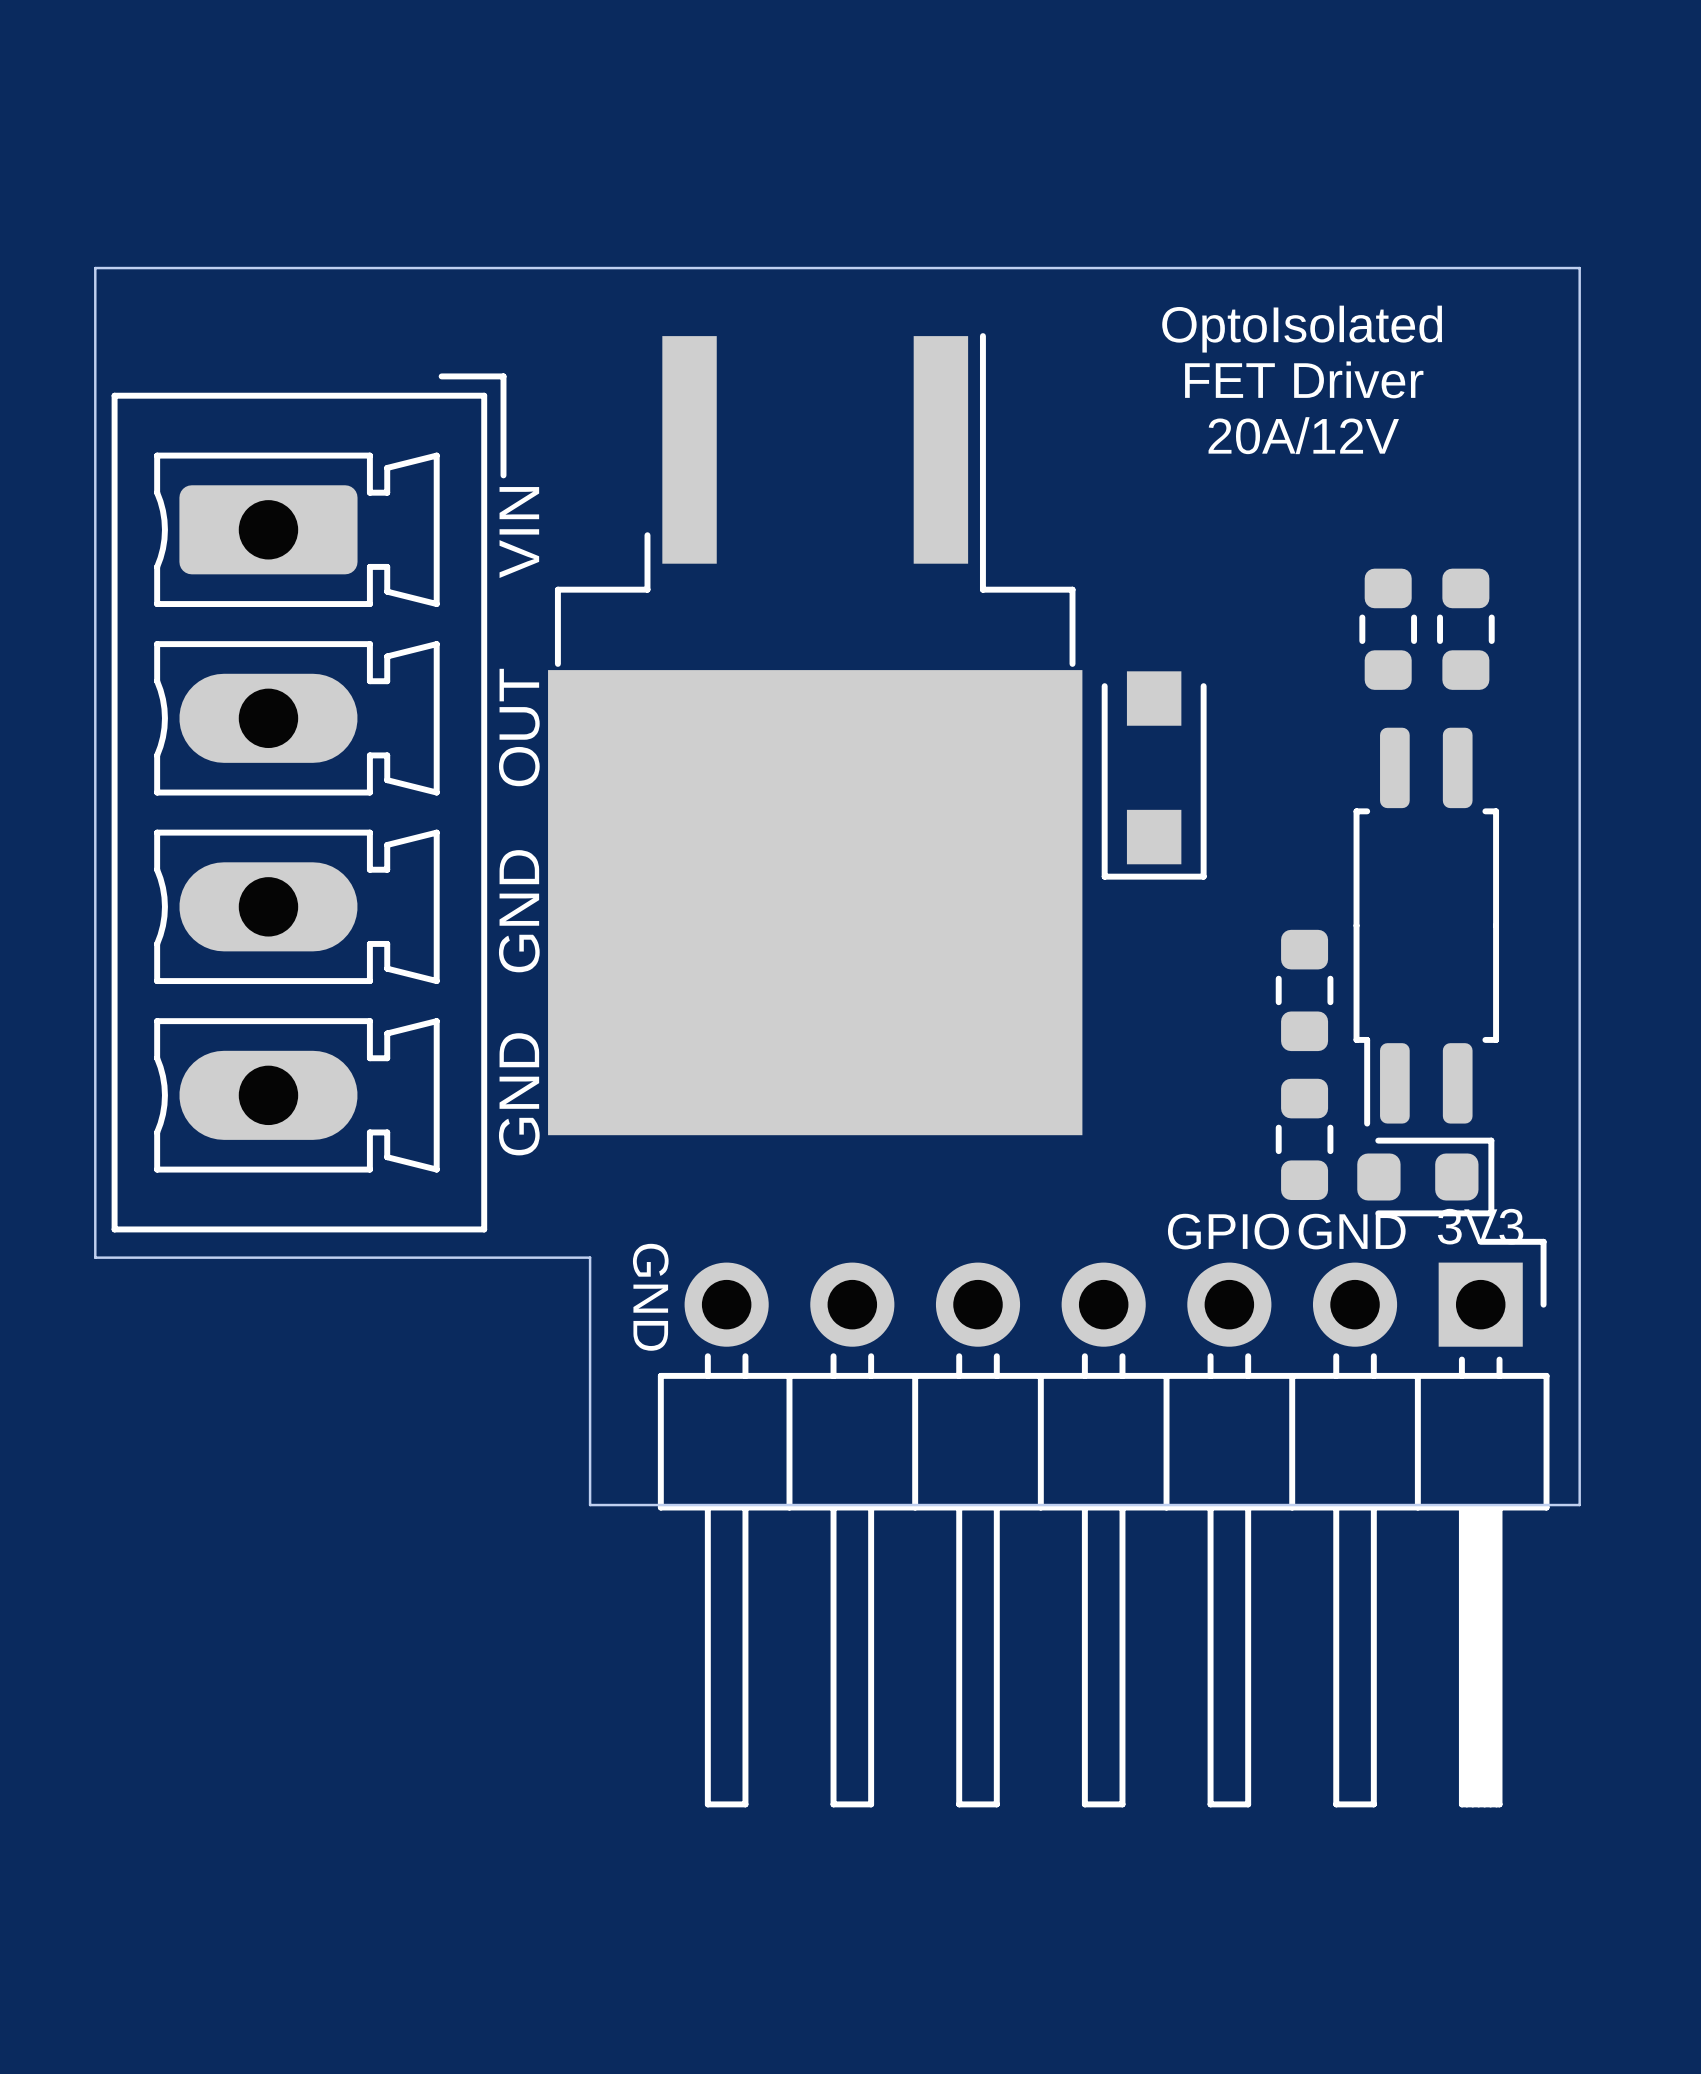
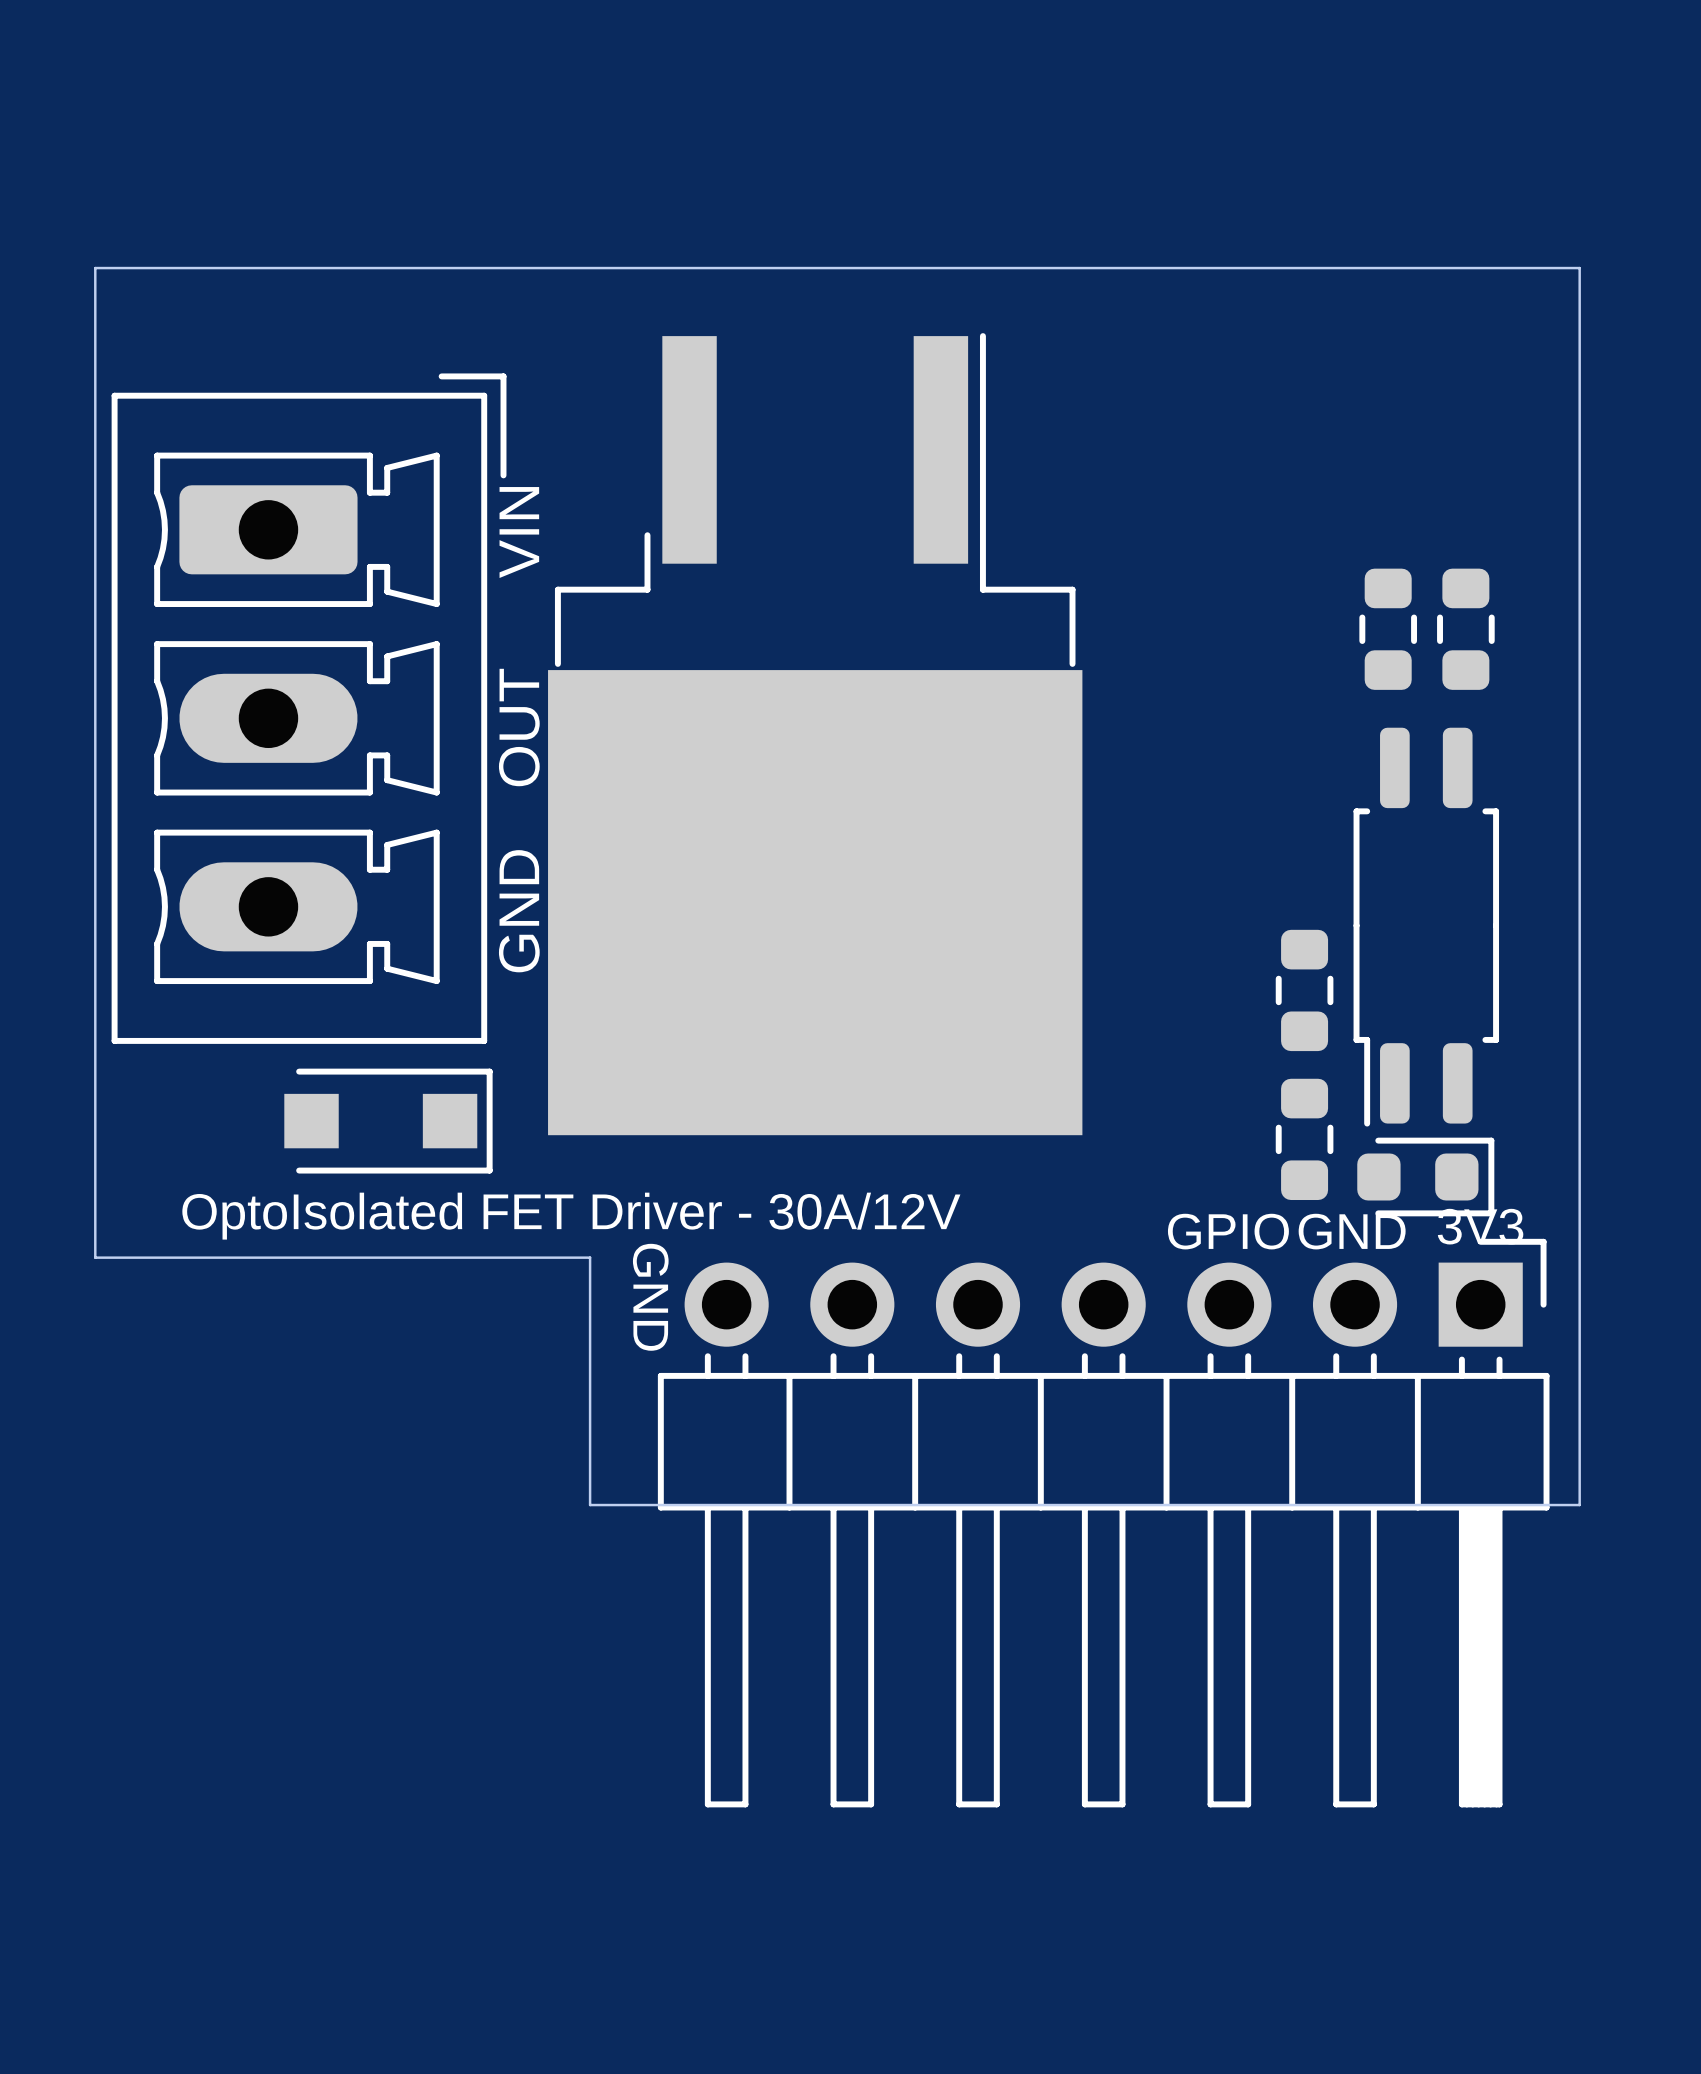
text: OptoIsolated (1302, 329) -> none
text: FET Driver (1304, 379) -> none
text: 20A/12V (1303, 435) -> none
part: none -> (309, 708)
part rotation: 0° (1154, 775) -> 90° counterclockwise (388, 1121)
part position: (1154, 775) -> (388, 1121)
part: (309, 802) -> none
text: GND (519, 1094) -> none
text: none -> OptoIsolated FET Driver - 30A/12V (571, 1216)

